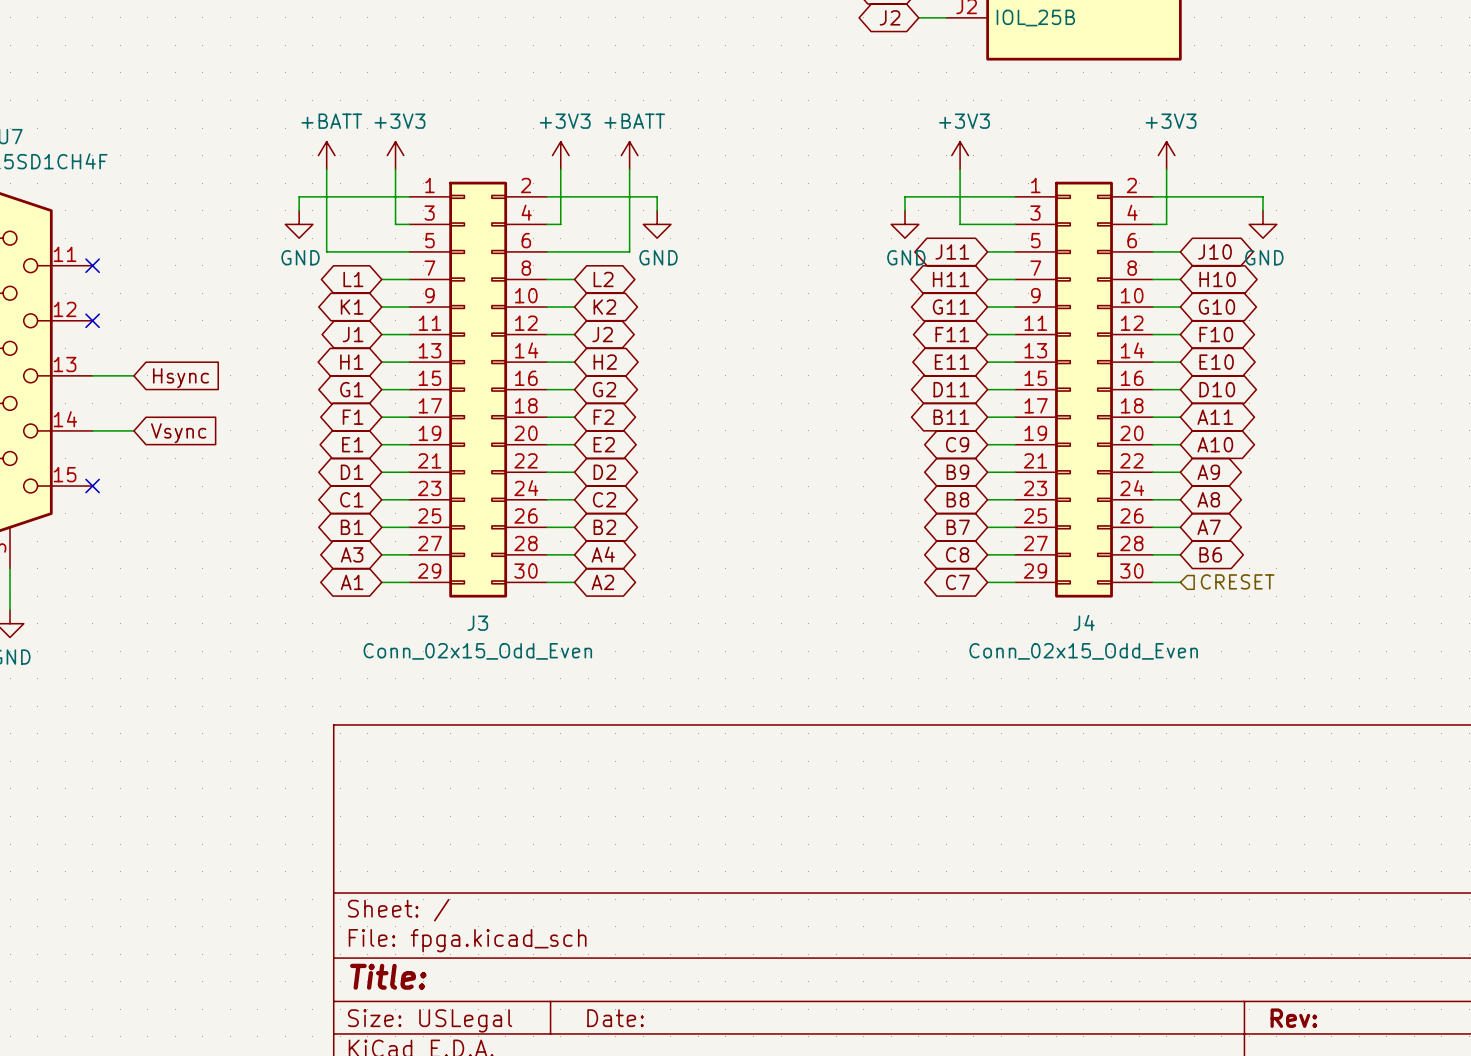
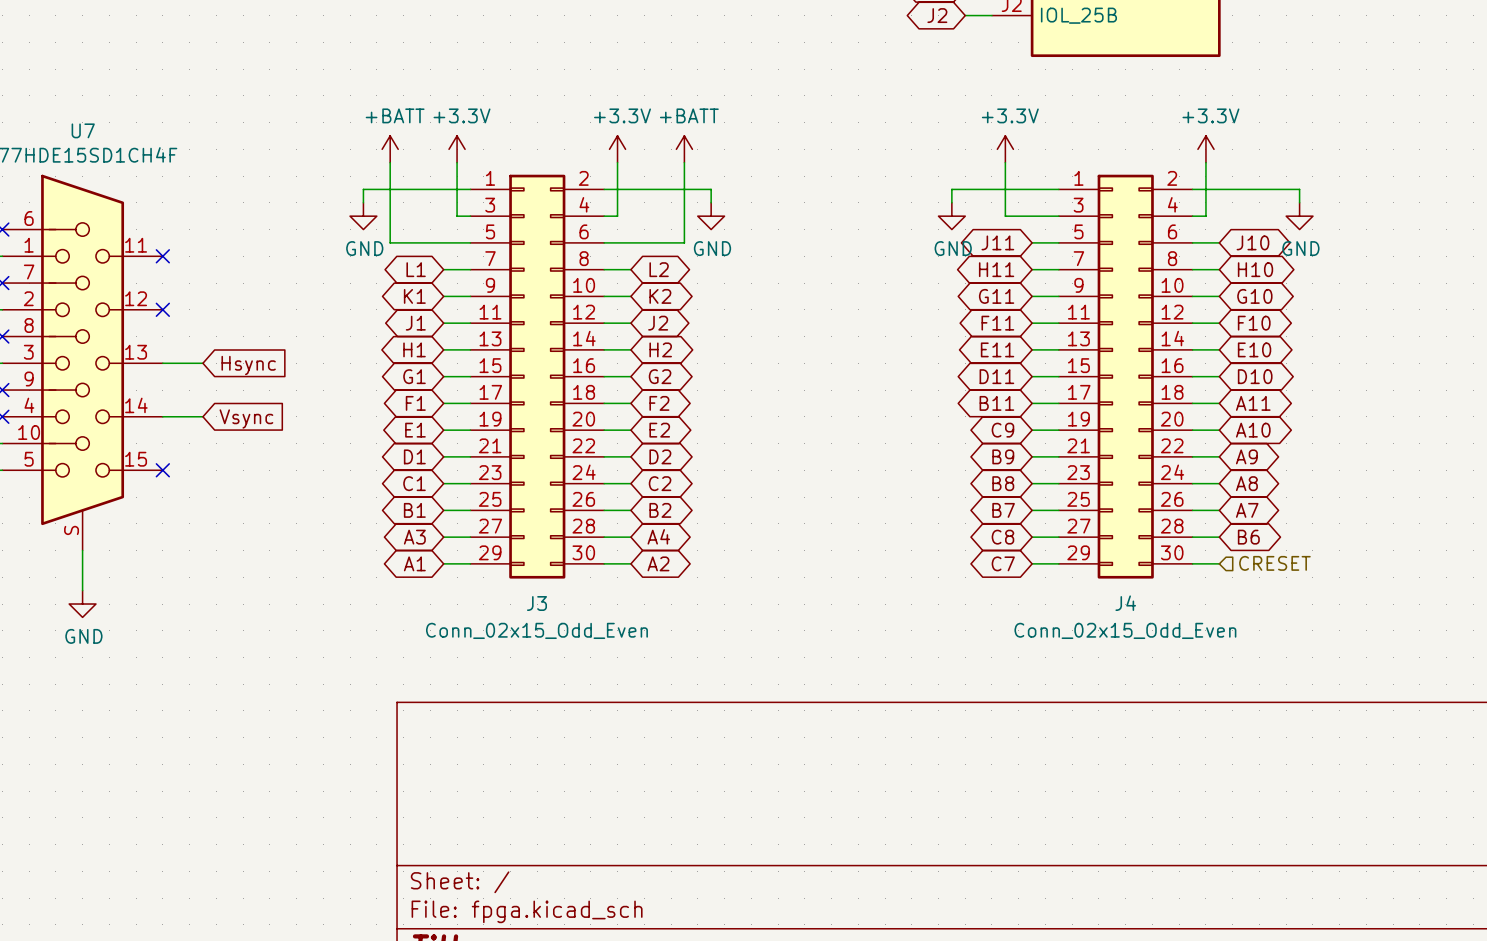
power symbol: +3V3 (395, 155) -> +3.3V (457, 149)
power symbol: +3V3 (560, 155) -> +3.3V (617, 149)
power symbol: +3V3 (960, 155) -> +3.3V (1005, 149)
power symbol: +3V3 (1166, 155) -> +3.3V (1205, 149)

